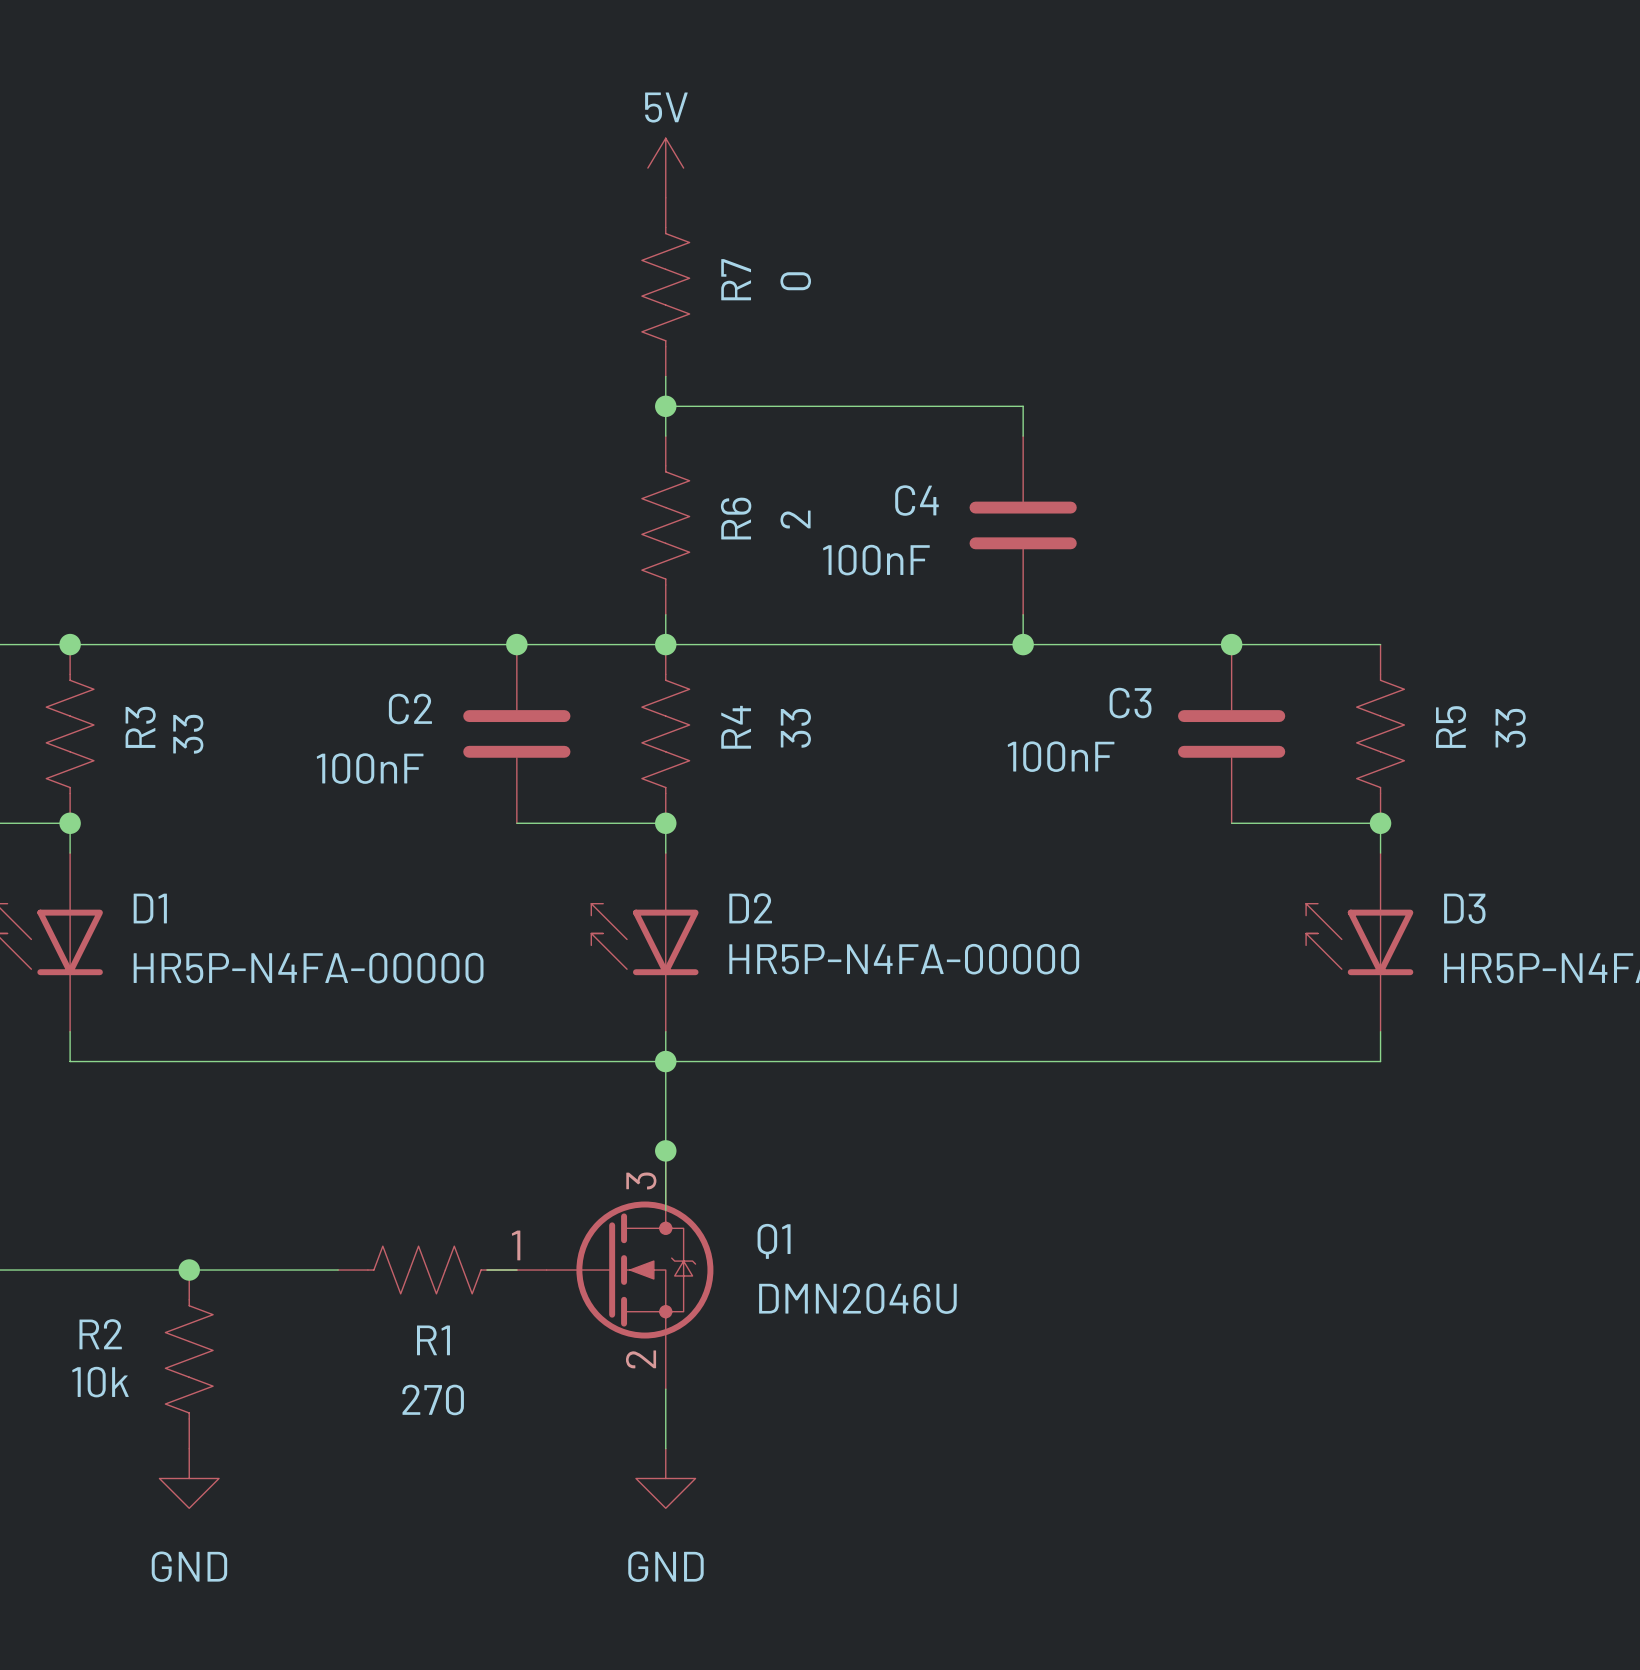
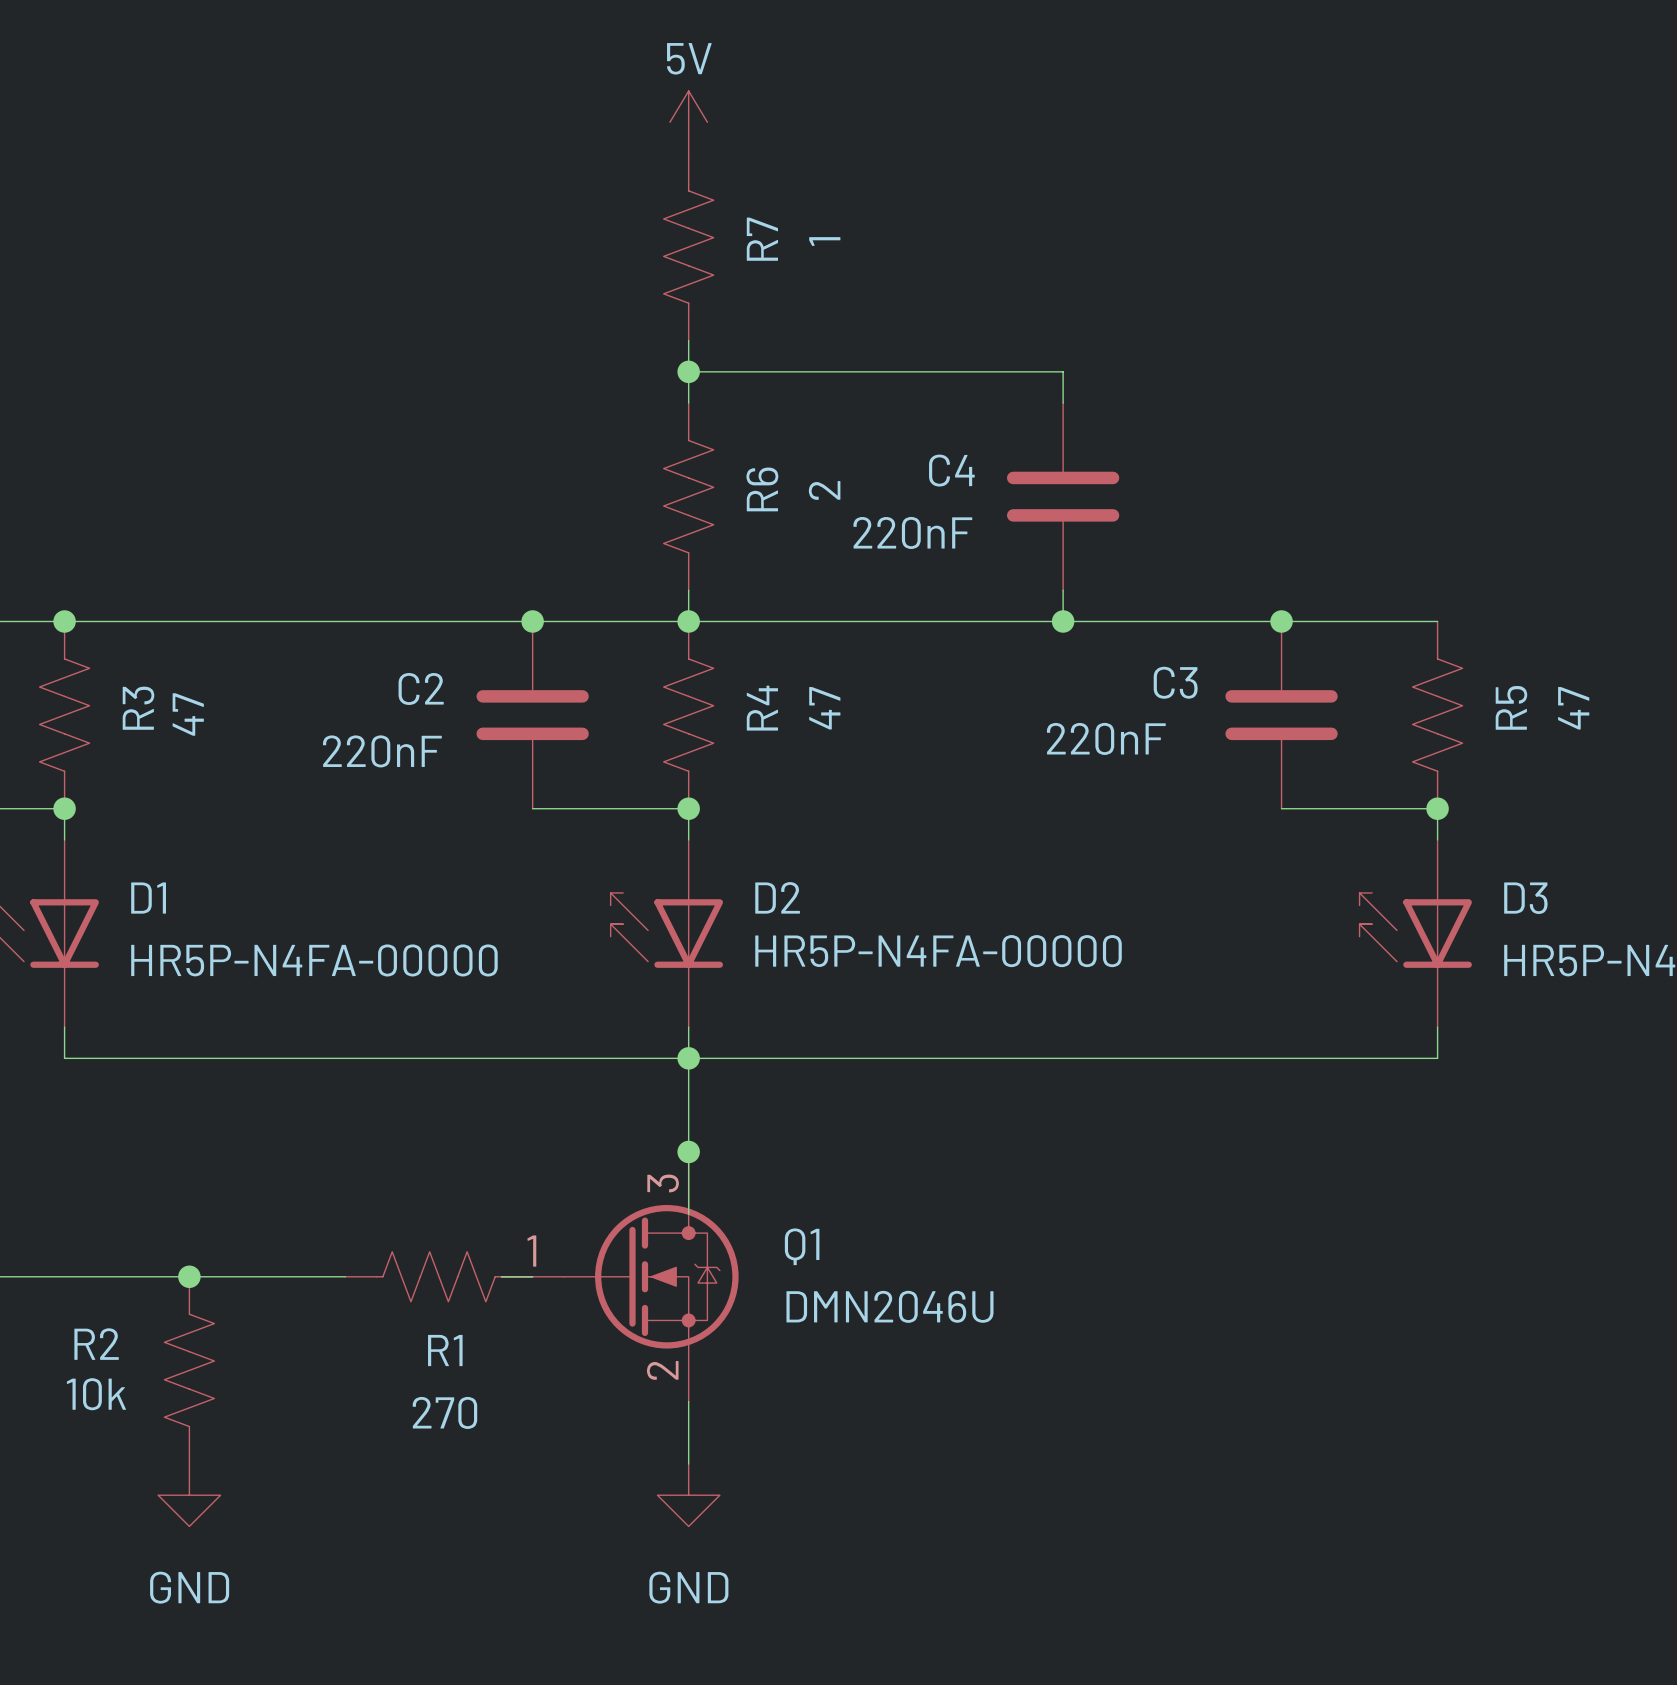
R7 value: 0 (795, 281) -> 1 (824, 241)
C4 value: 100nF (876, 560) -> 220nF (912, 532)
R4 value: 33 (795, 728) -> 47 (824, 708)
R5 value: 33 (1510, 728) -> 47 (1573, 708)
R3 value: 33 (188, 734) -> 47 (188, 714)
C3 value: 100nF (1061, 756) -> 220nF (1106, 738)
C2 value: 100nF (370, 768) -> 220nF (382, 751)

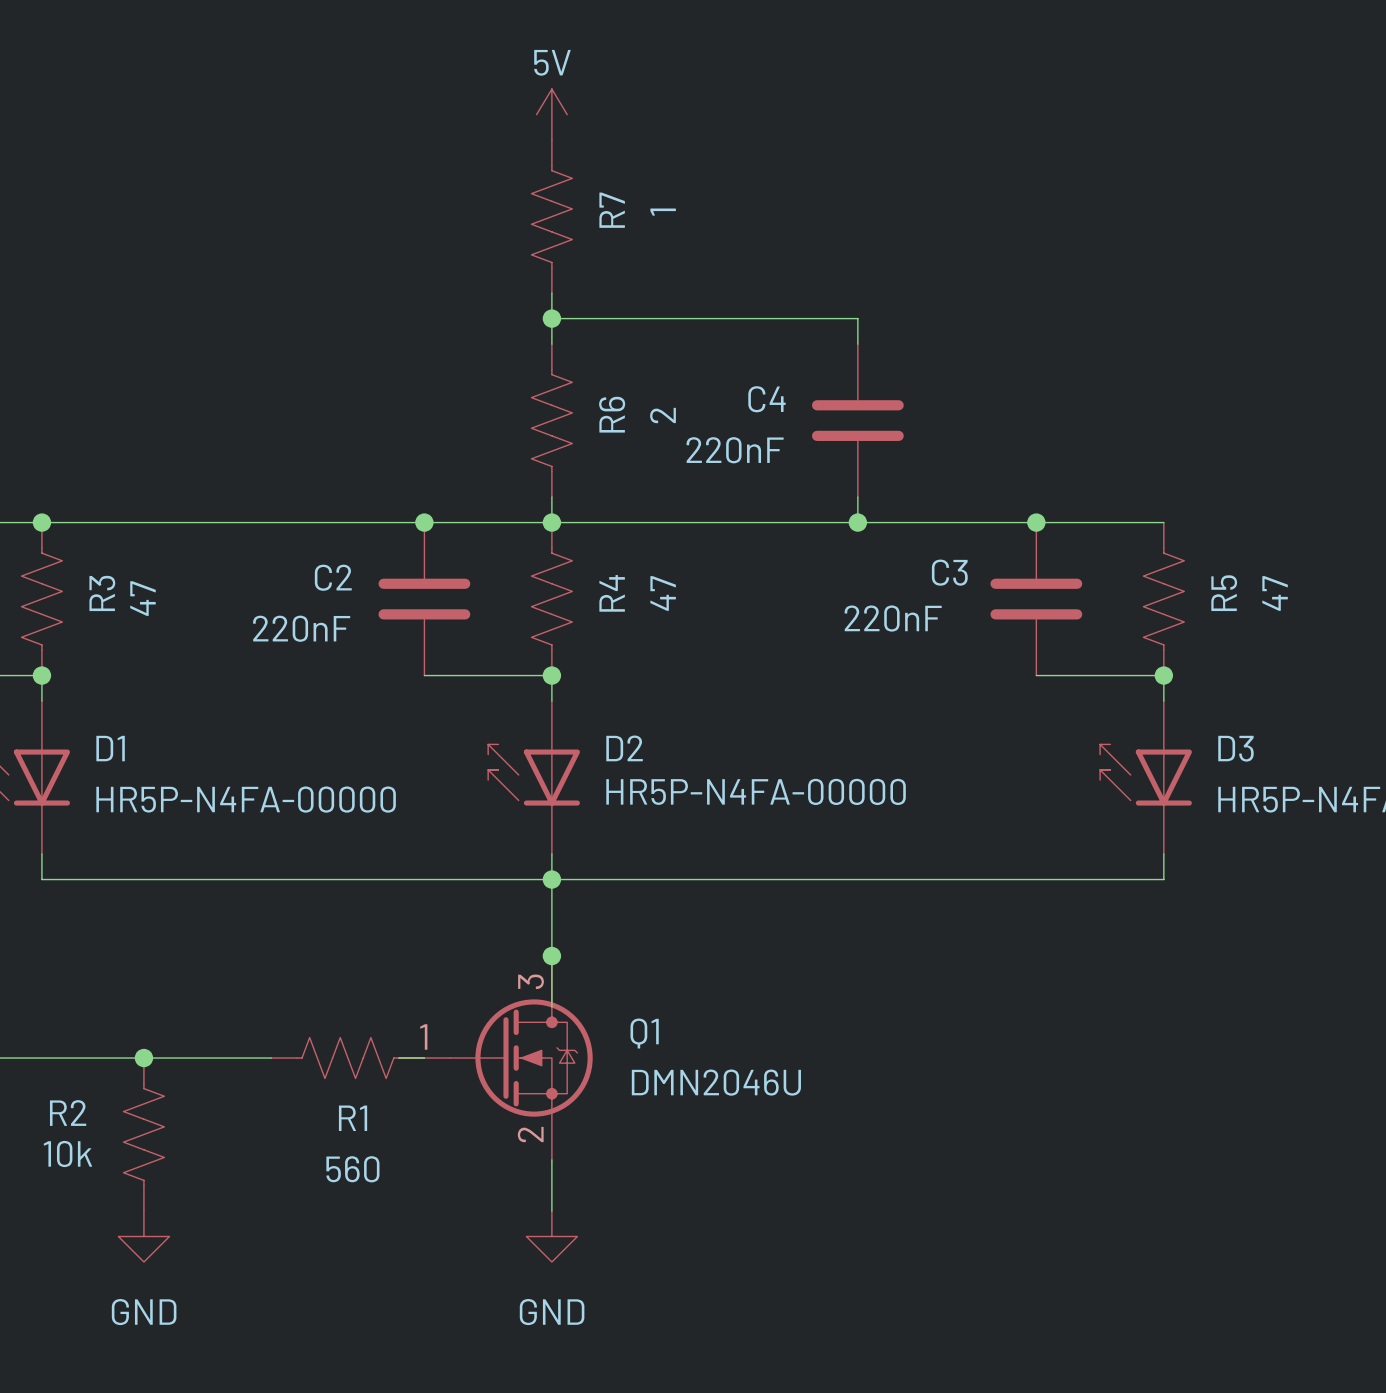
R1 value: 270 (444, 1412) -> 560 (352, 1169)

